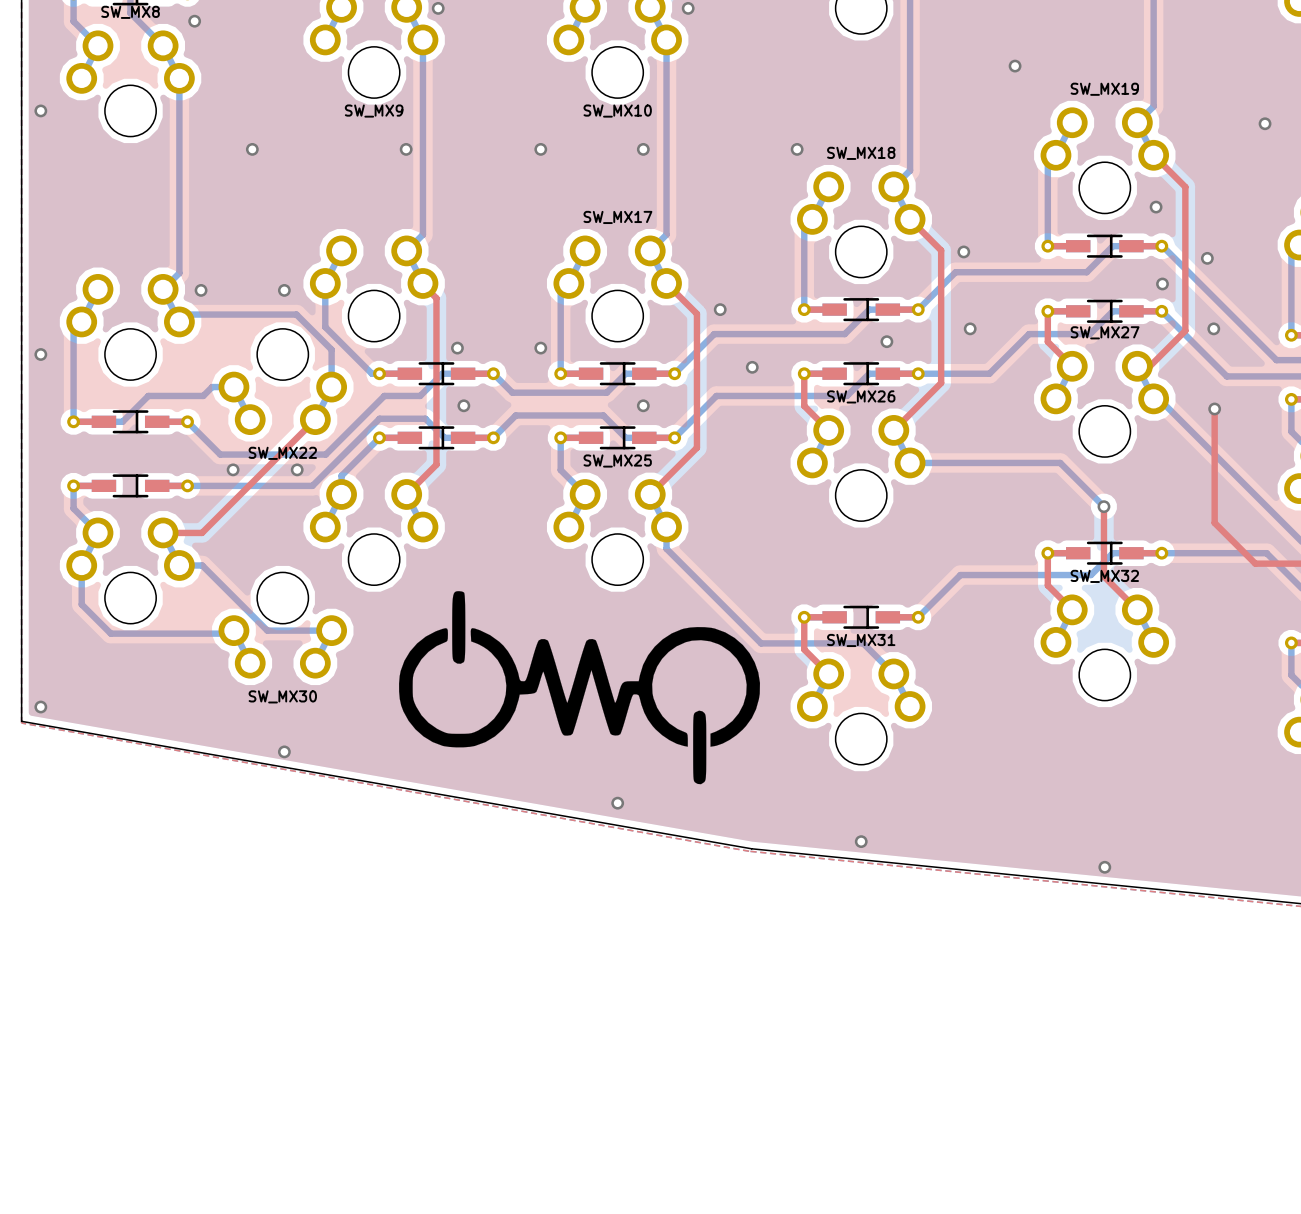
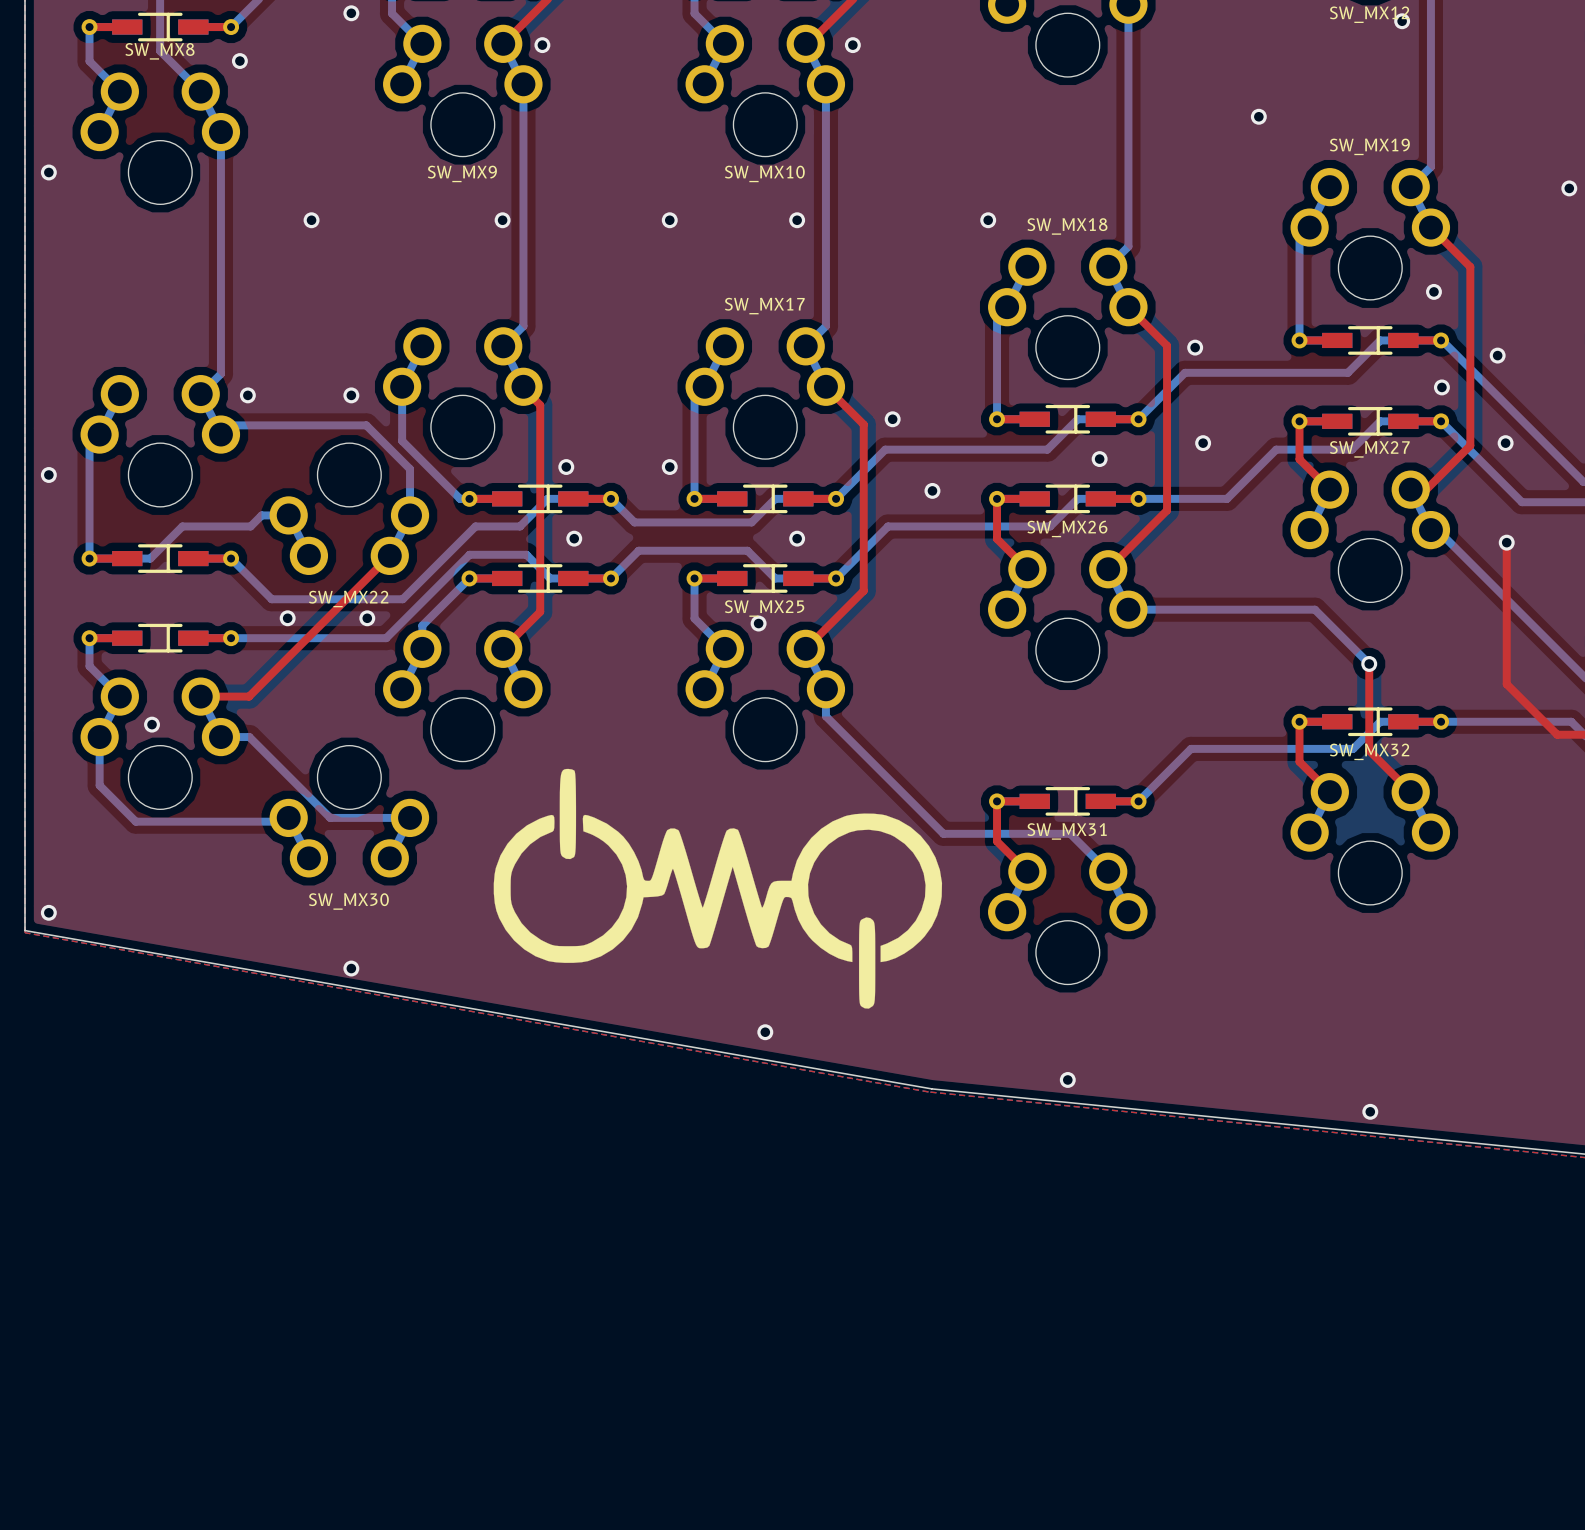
via: none -> (758, 623)
via: none -> (152, 724)

